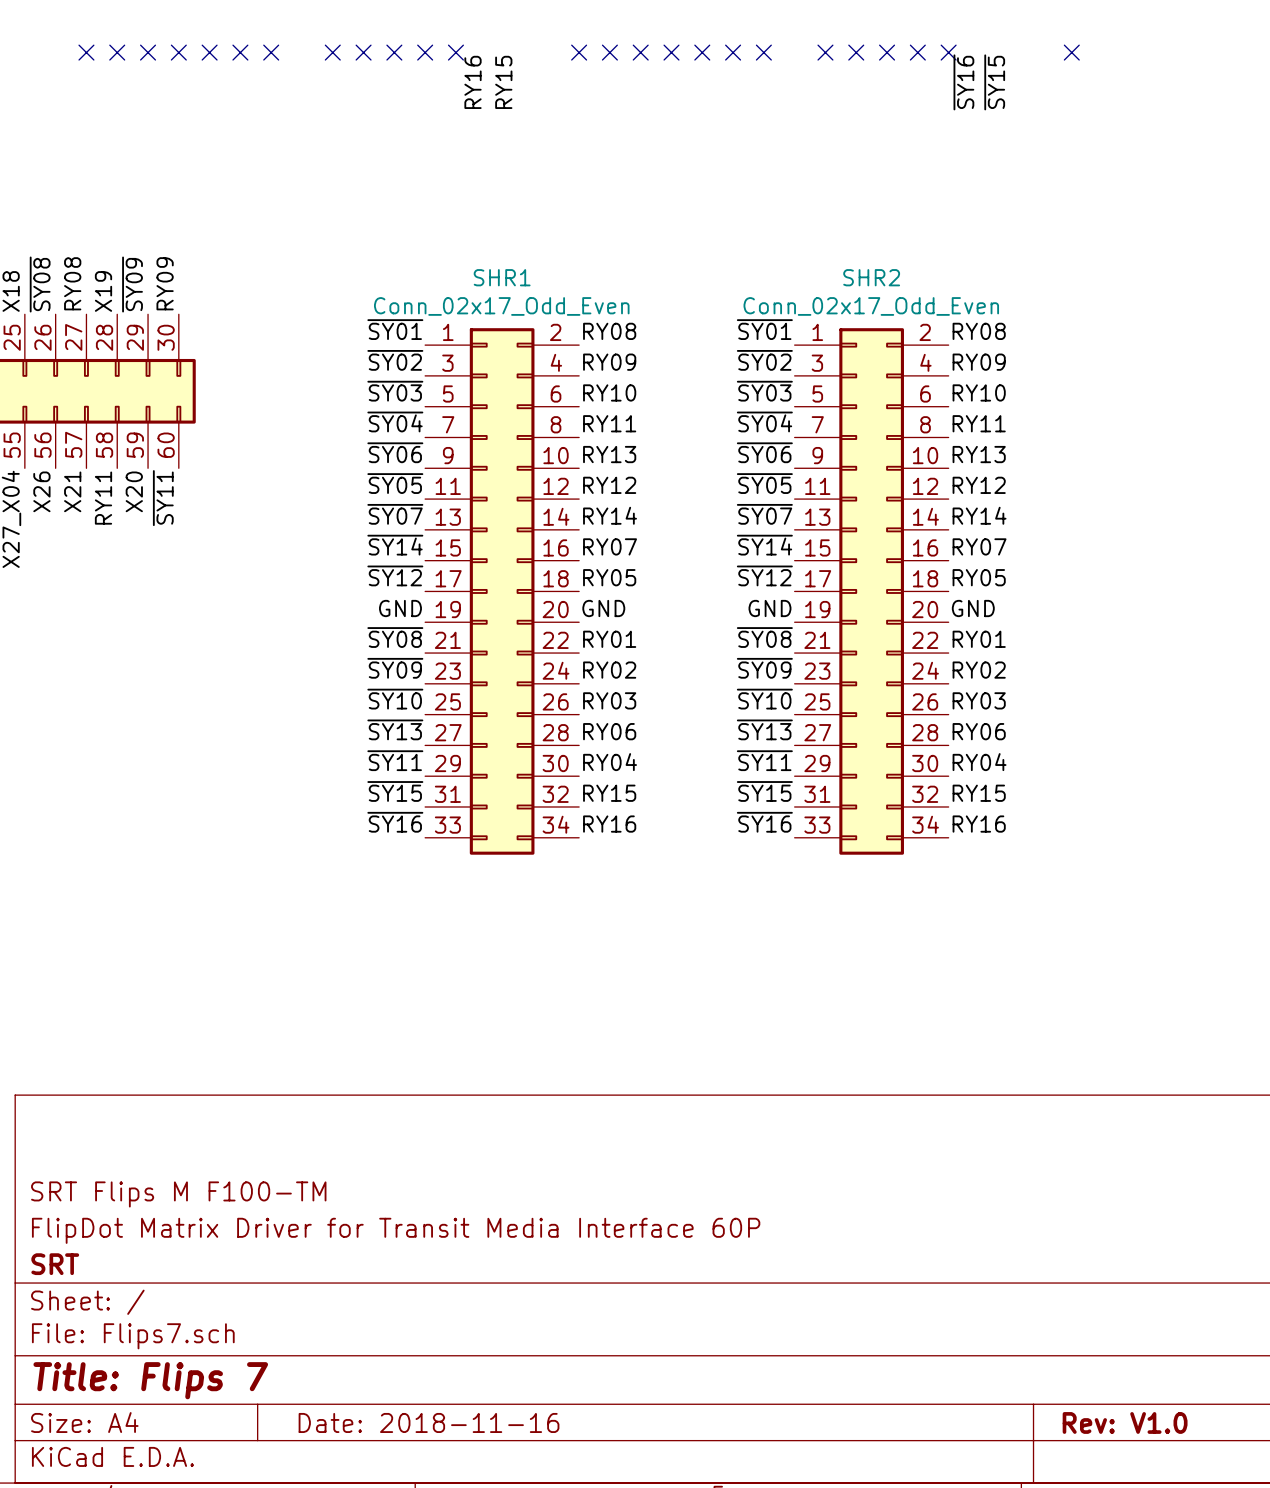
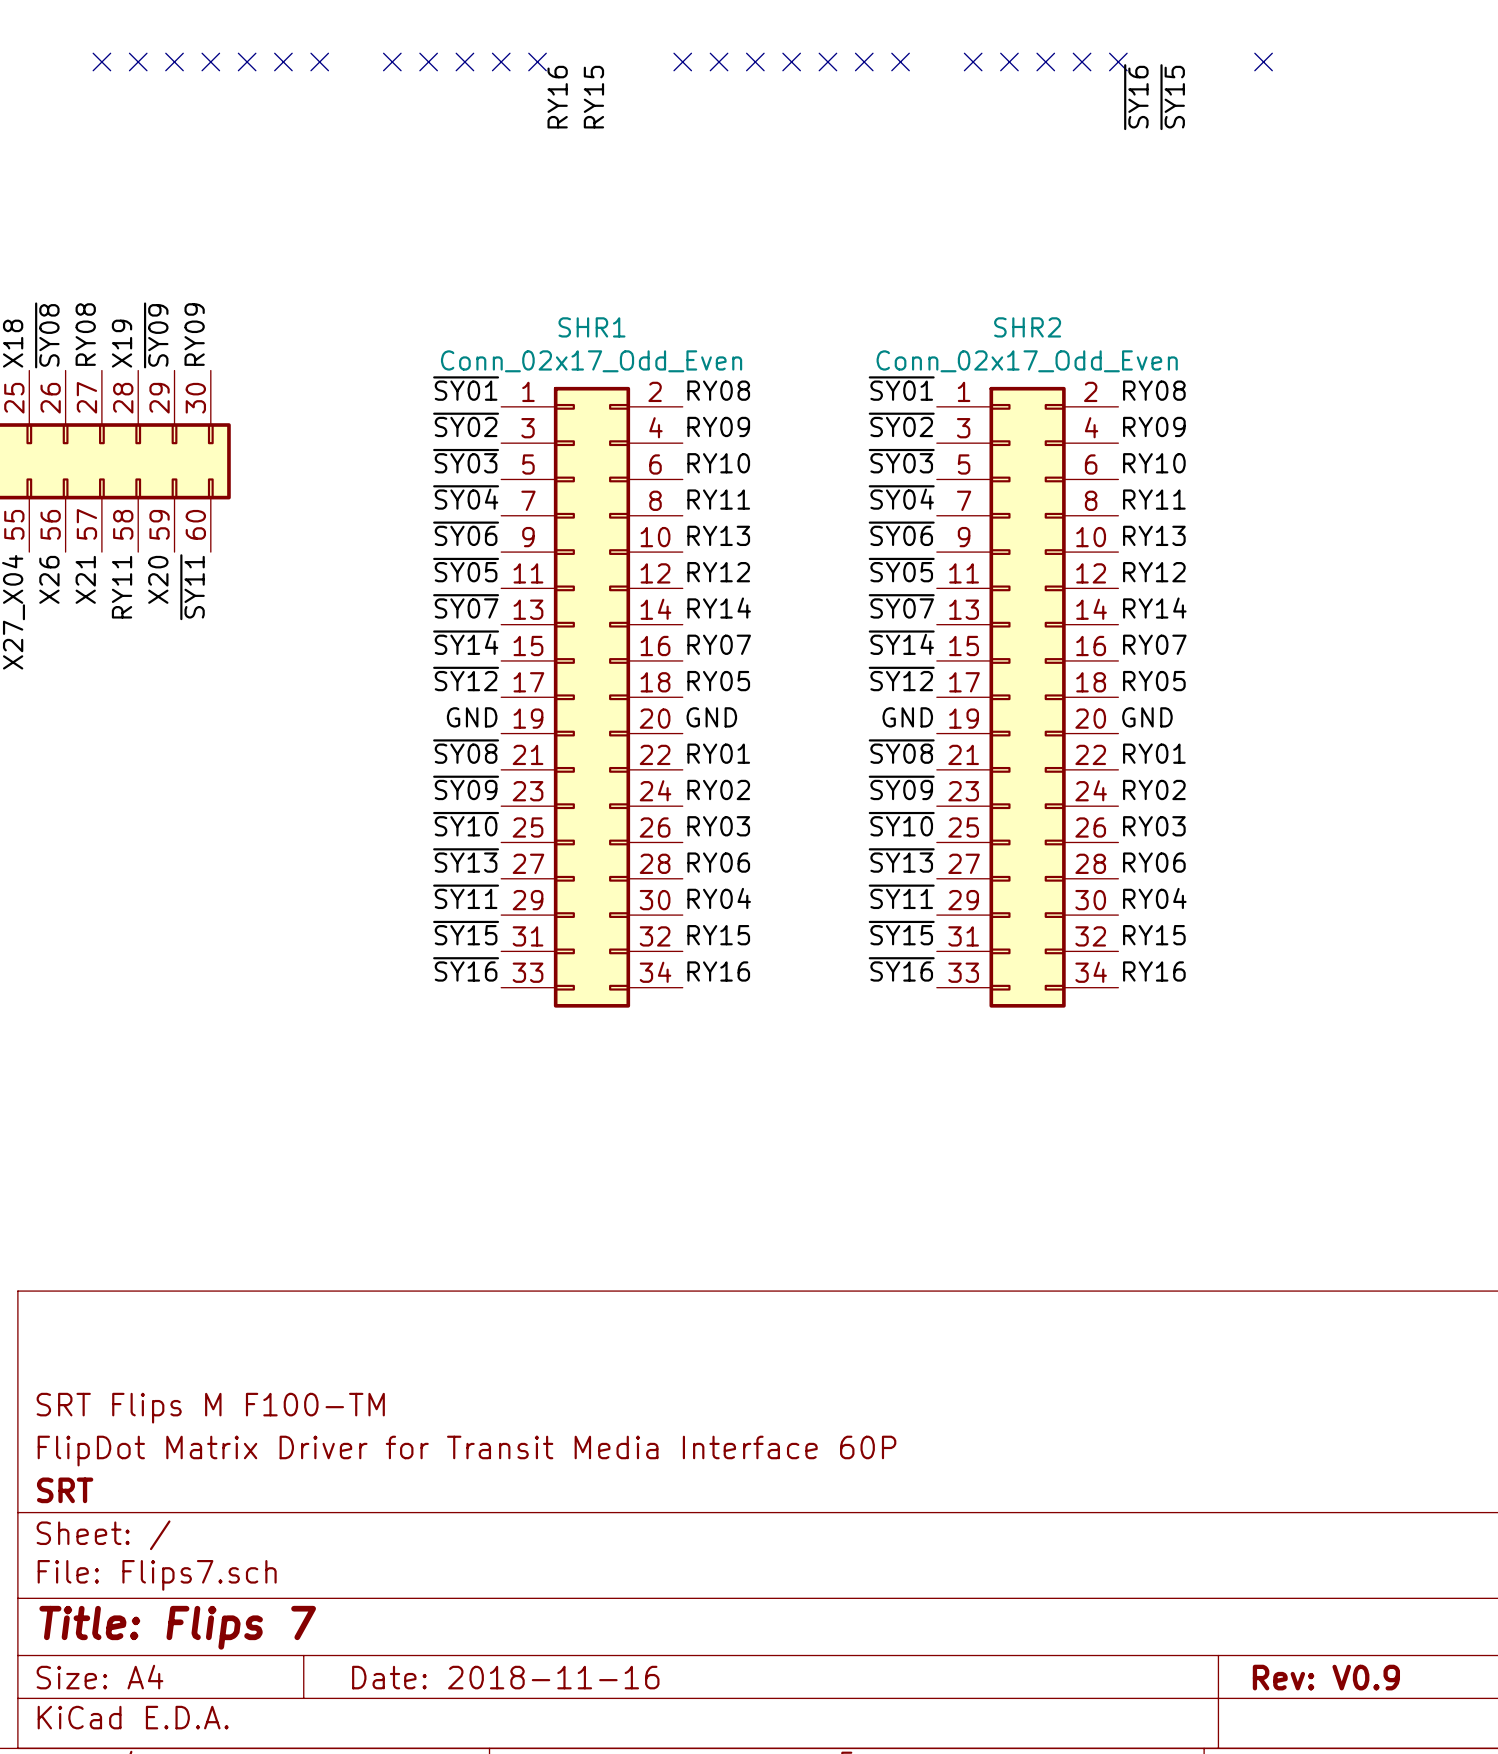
title block: Rev: V1.0 (1125, 1422) -> Rev: V0.9 (1326, 1677)

